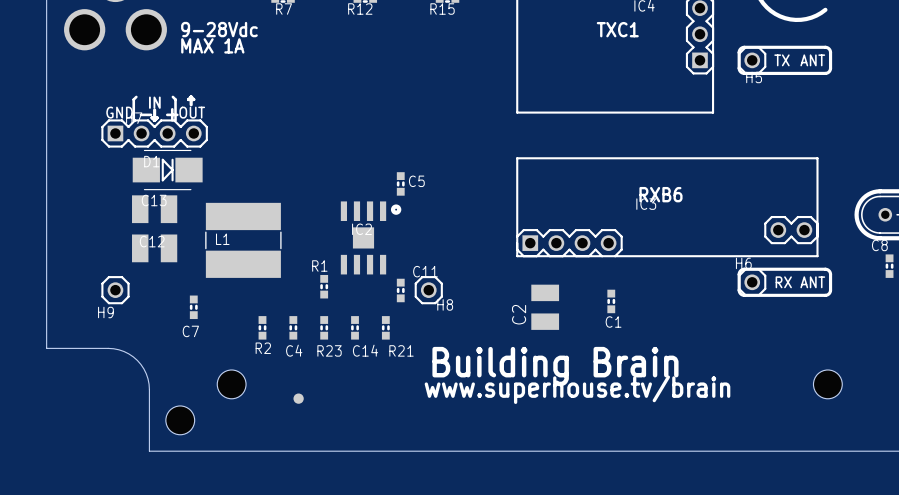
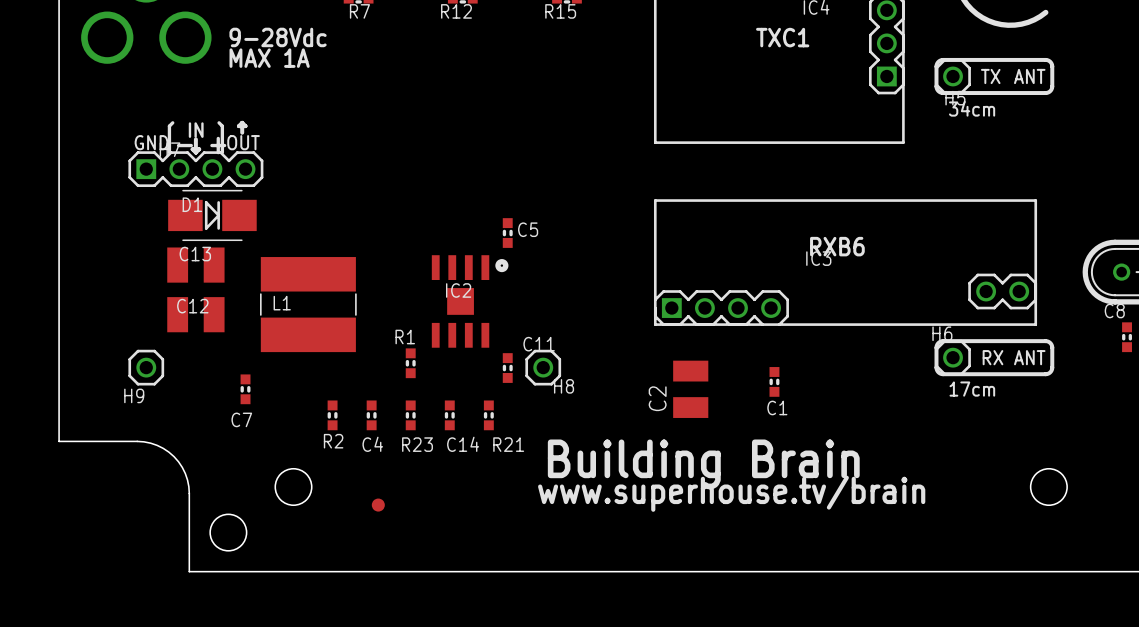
text: none -> 34cm (972, 108)
text: none -> 17cm (972, 389)

